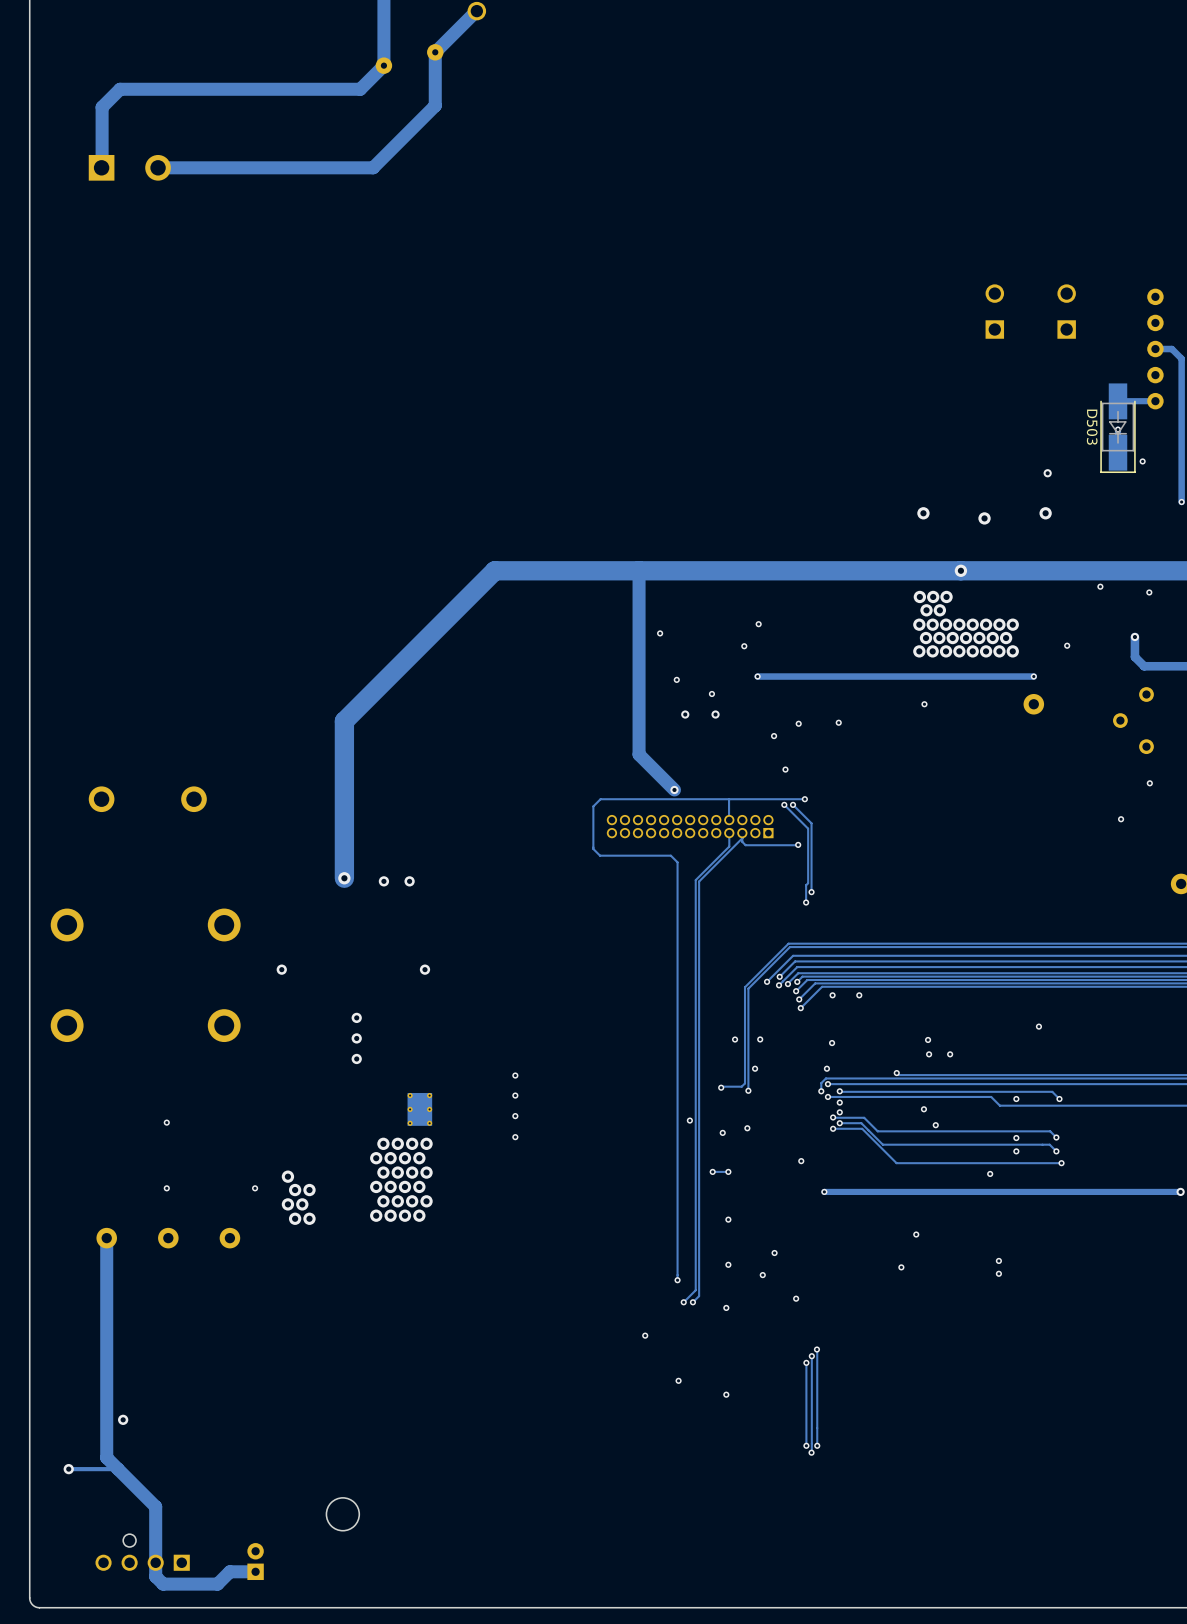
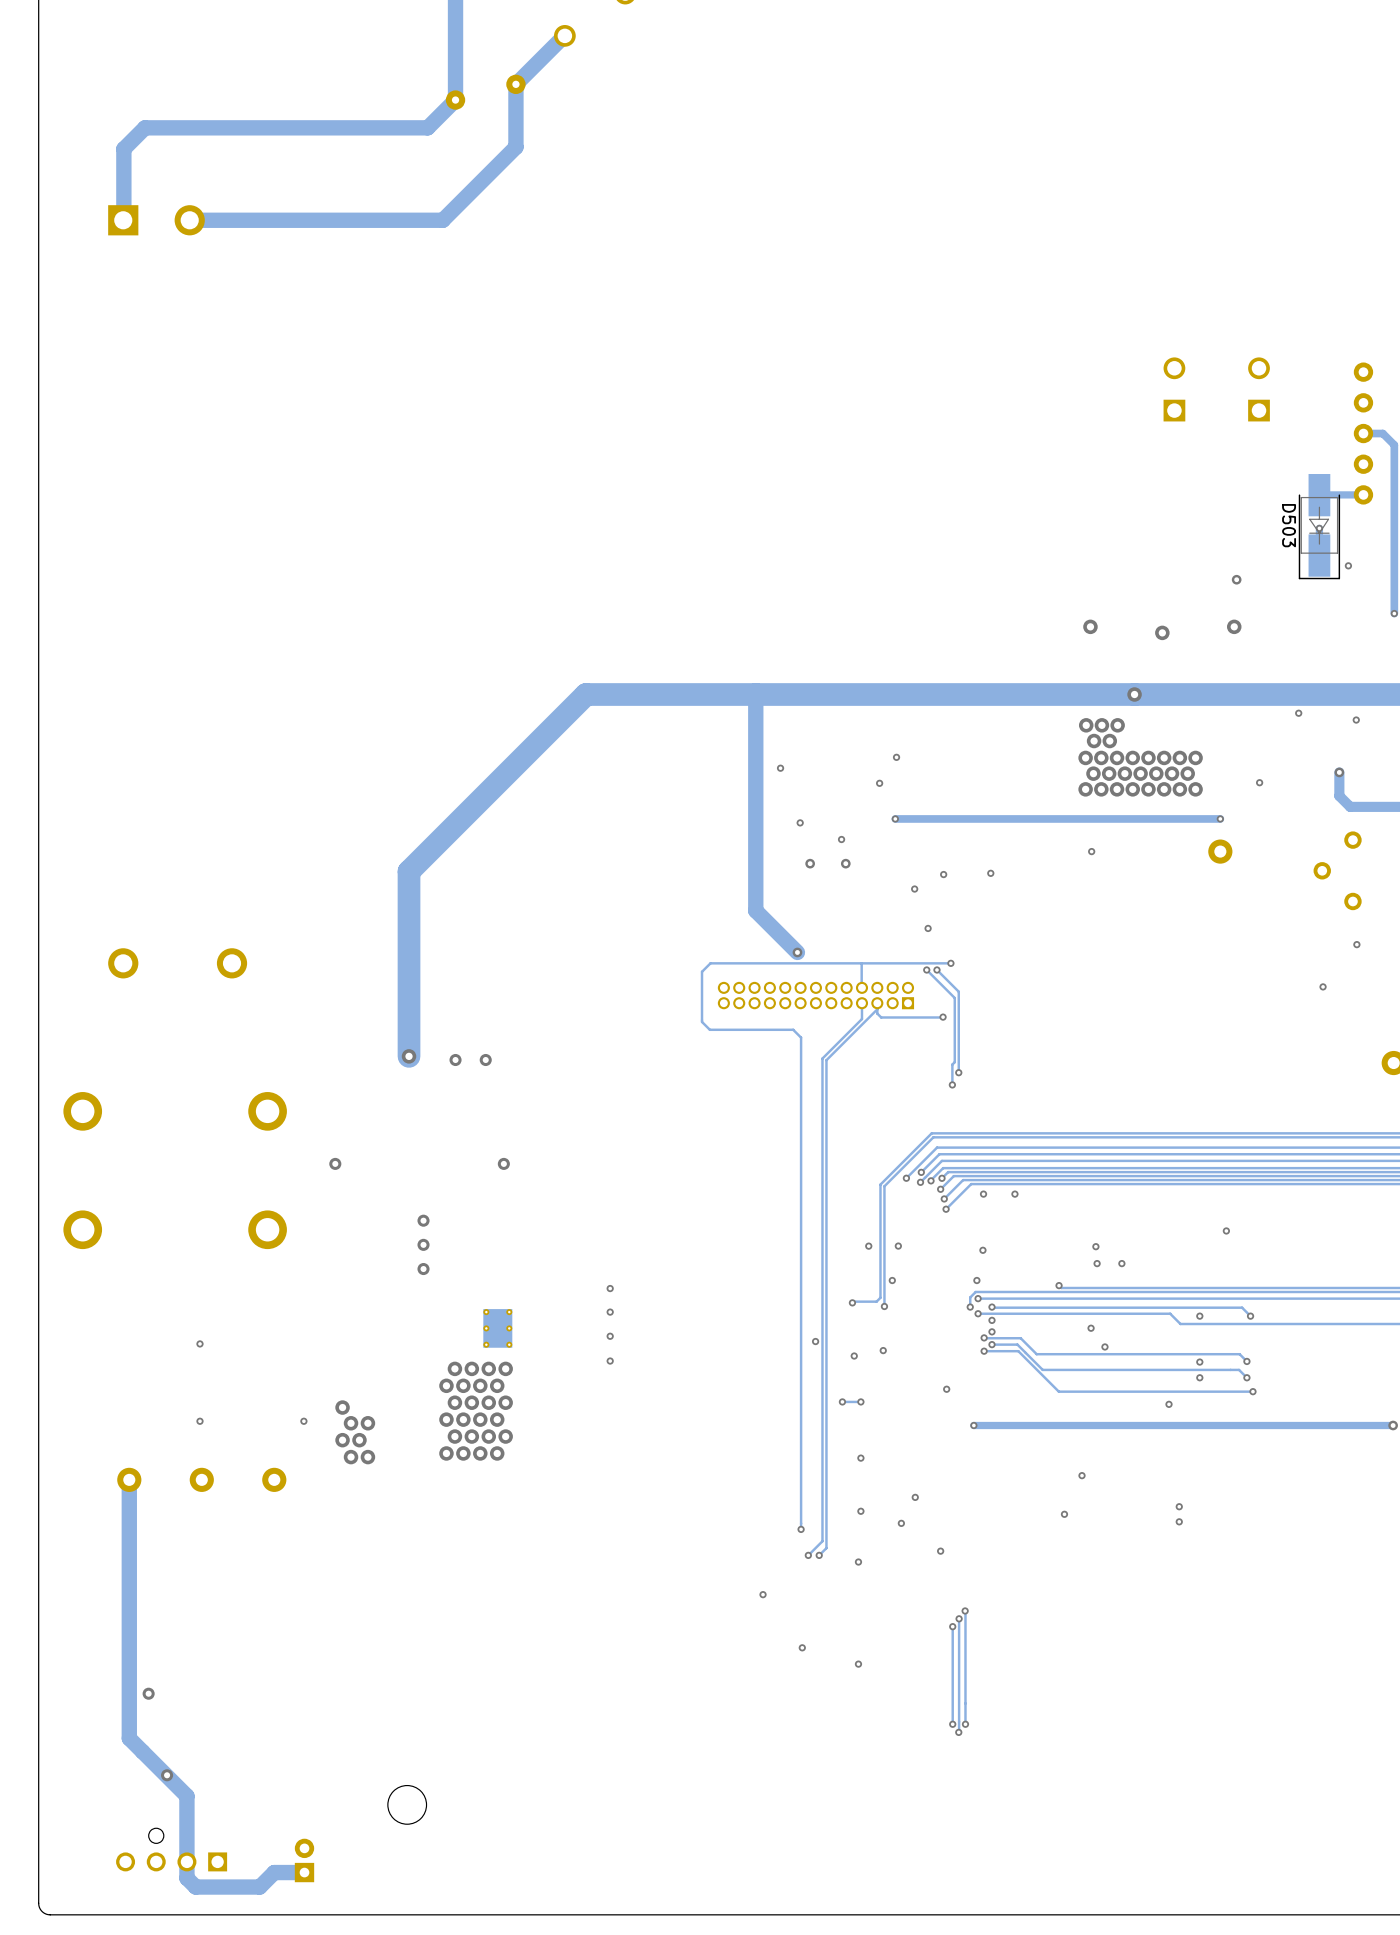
via: (68, 1469) -> none
track: (118, 1469) (68, 1469) -> none
via: none -> (167, 1775)

